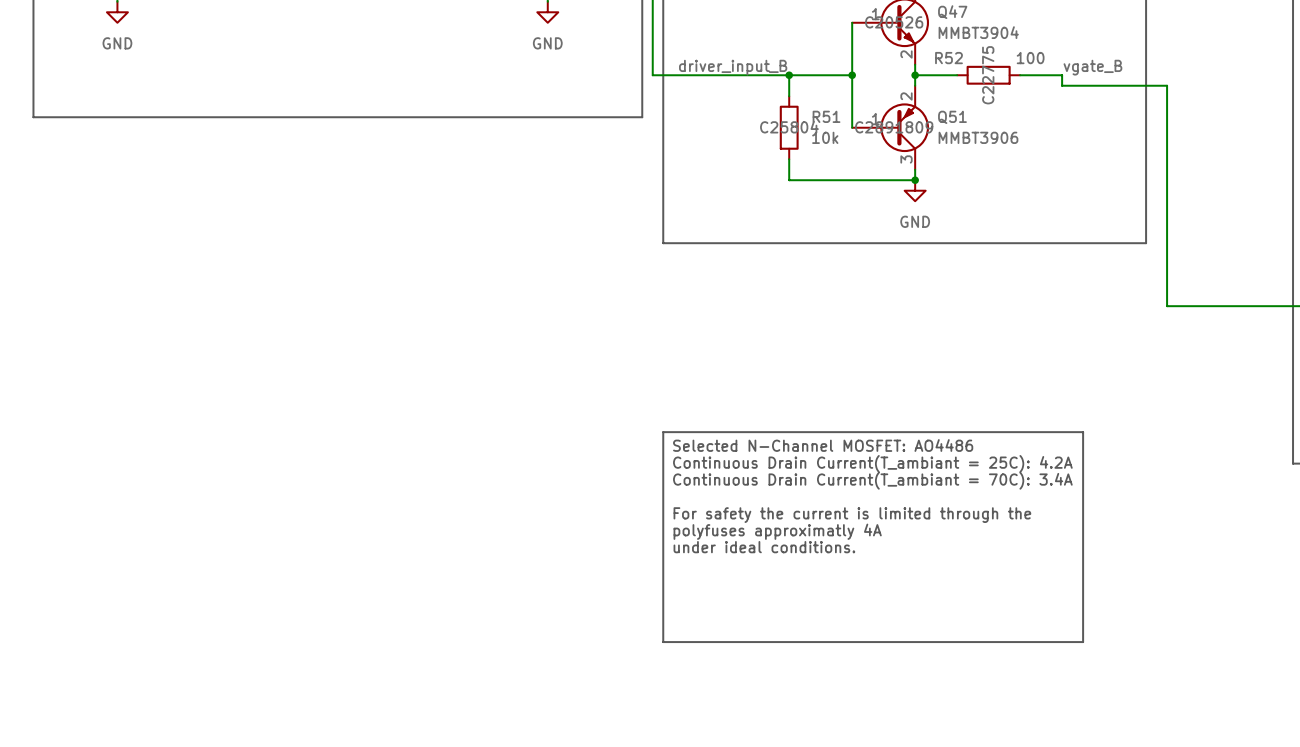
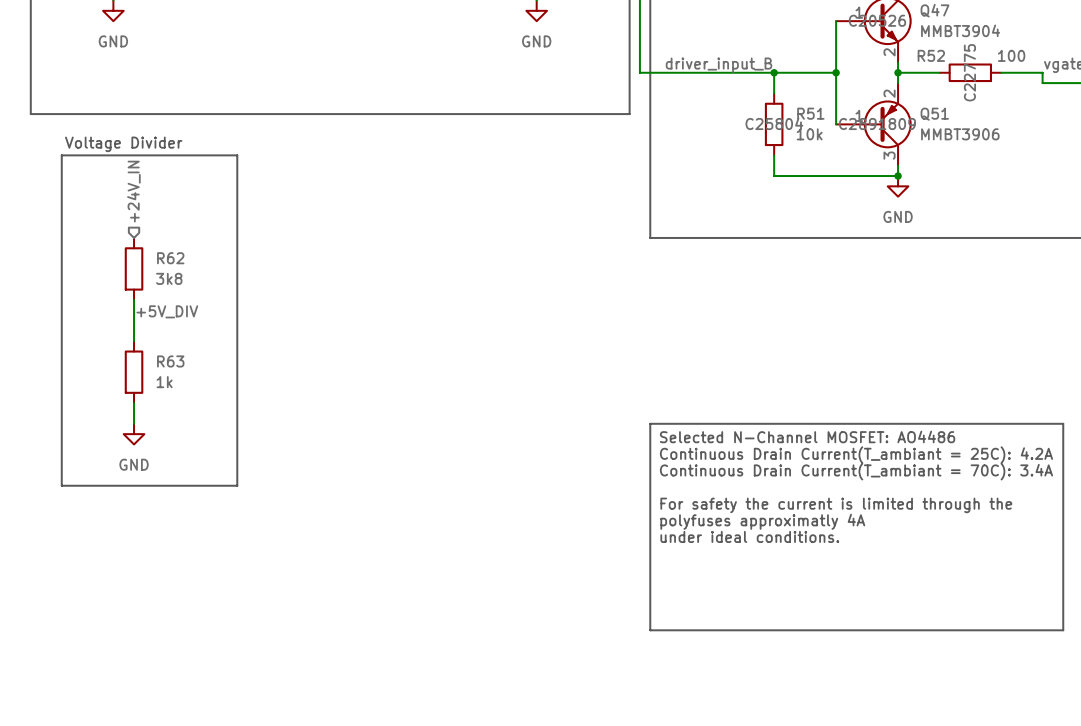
text: none -> Voltage Divider (123, 144)
line: none -> (61, 155) (237, 155) (237, 485) (61, 485) (61, 155)
hierarchical label: none -> +24V_IN (133, 191)
R62: none -> 3k8 (134, 268)
wire: none -> (134, 299) (134, 341)
label: none -> +5V_DIV (167, 311)
R63: none -> 1k (134, 372)
wire: none -> (134, 403) (134, 423)
power symbol: none -> GND (134, 434)

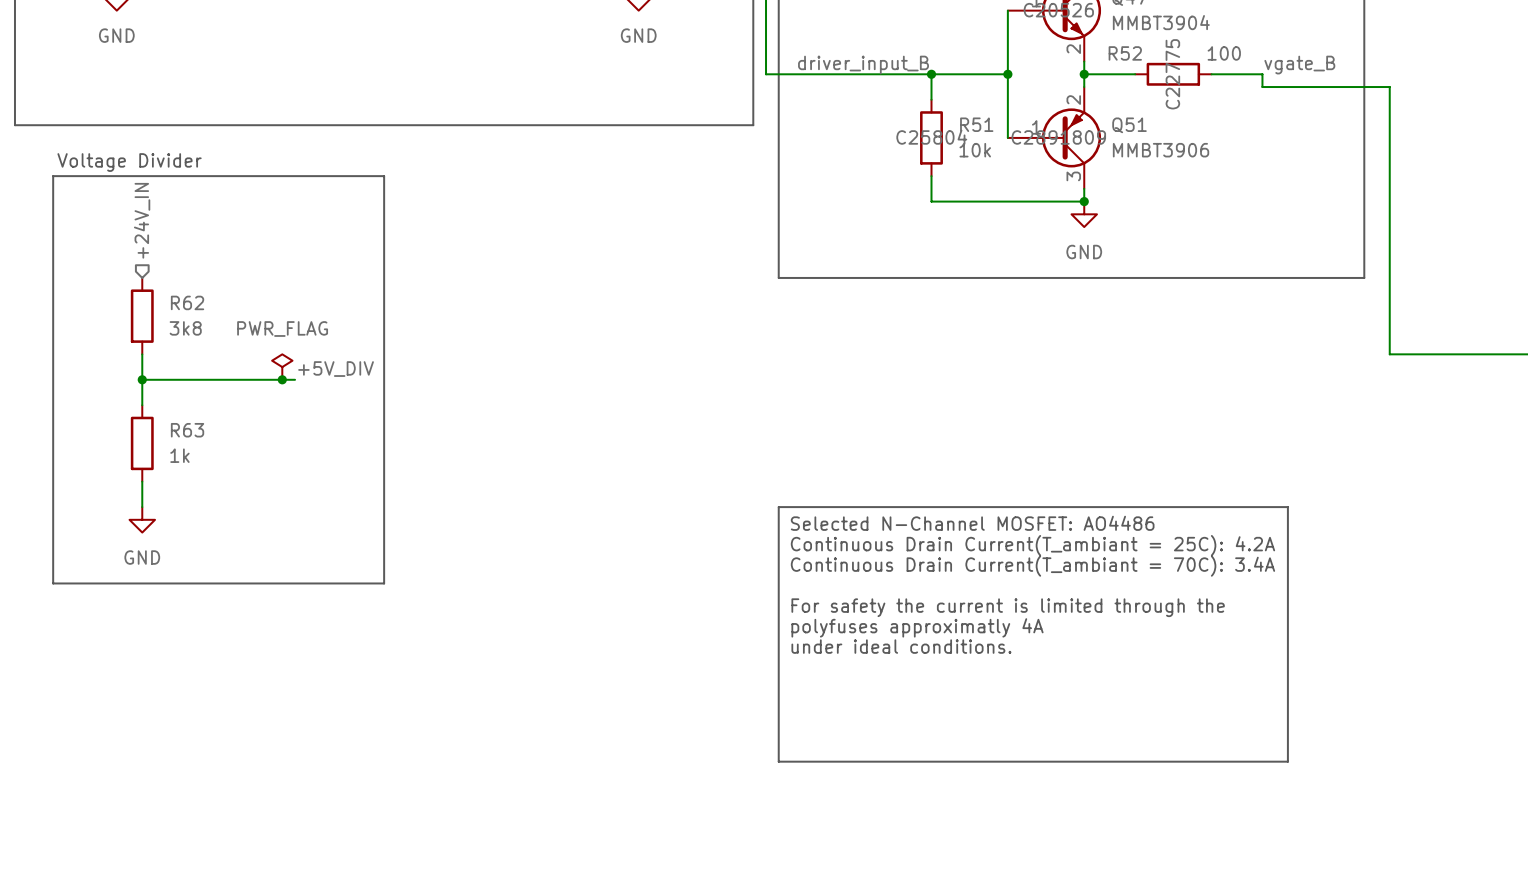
line: (237, 155) (237, 485) -> (269, 176) (384, 176) (384, 583) (269, 583)
power symbol: none -> PWR_FLAG (282, 367)
label position: +5V_DIV (167, 311) -> +5V_DIV (336, 369)
wire: none -> (142, 379) (295, 379)
junction: none -> (142, 379)
junction: none -> (282, 379)

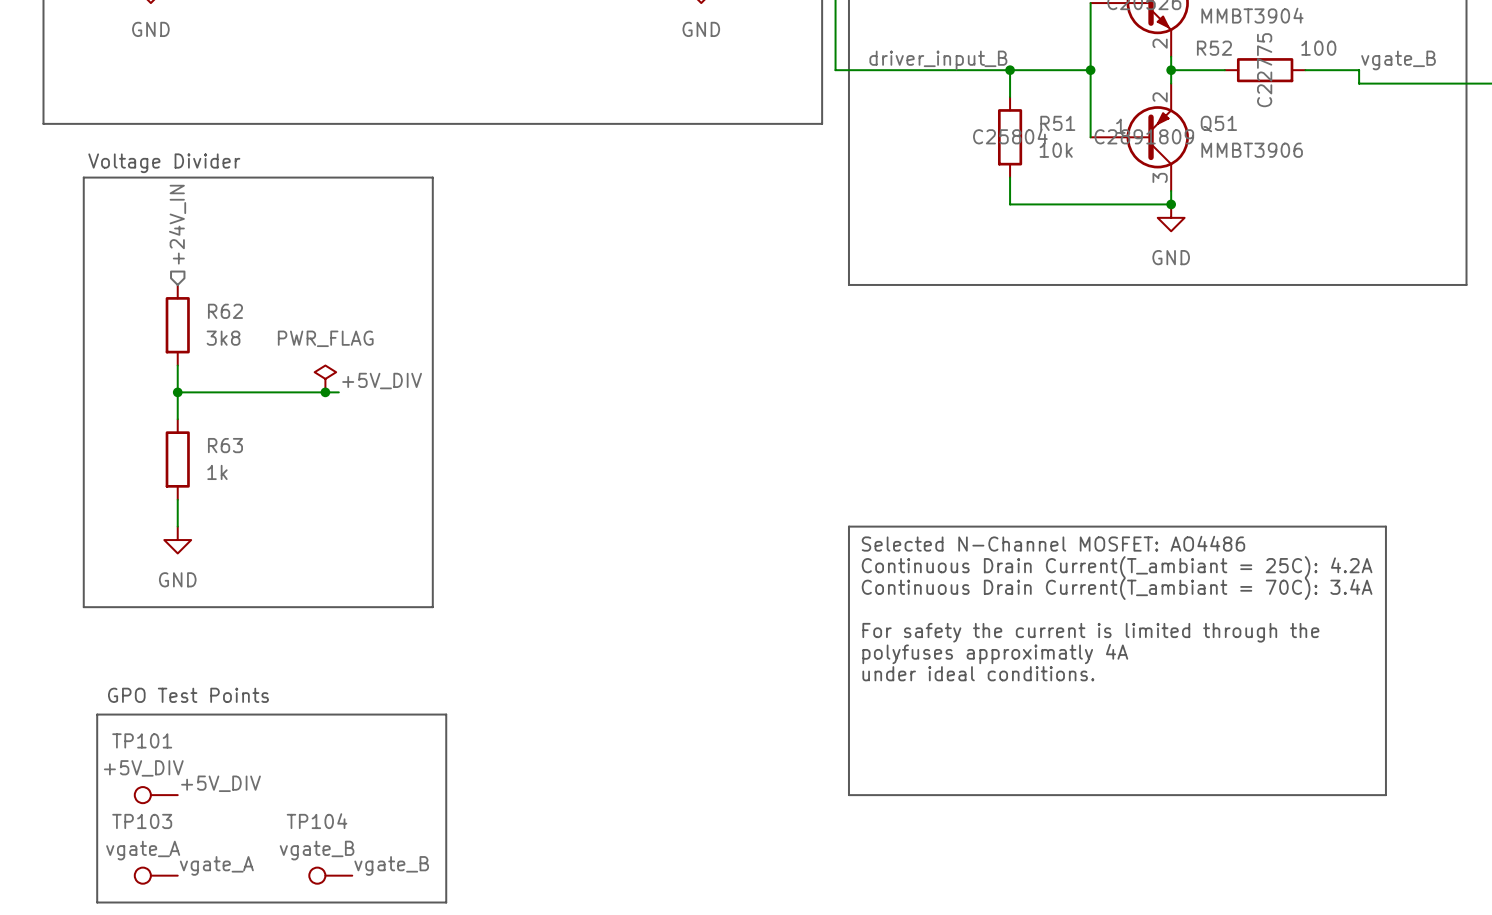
text: none -> GPO Test Points (188, 695)
line: none -> (97, 714) (446, 714) (446, 902) (97, 902) (97, 714)
label: none -> +5V_DIV (220, 783)
TP101: none -> +5V_DIV (156, 795)
label: none -> vgate_A (216, 865)
label: none -> vgate_B (391, 865)
TP103: none -> vgate_A (156, 875)
TP104: none -> vgate_B (330, 875)

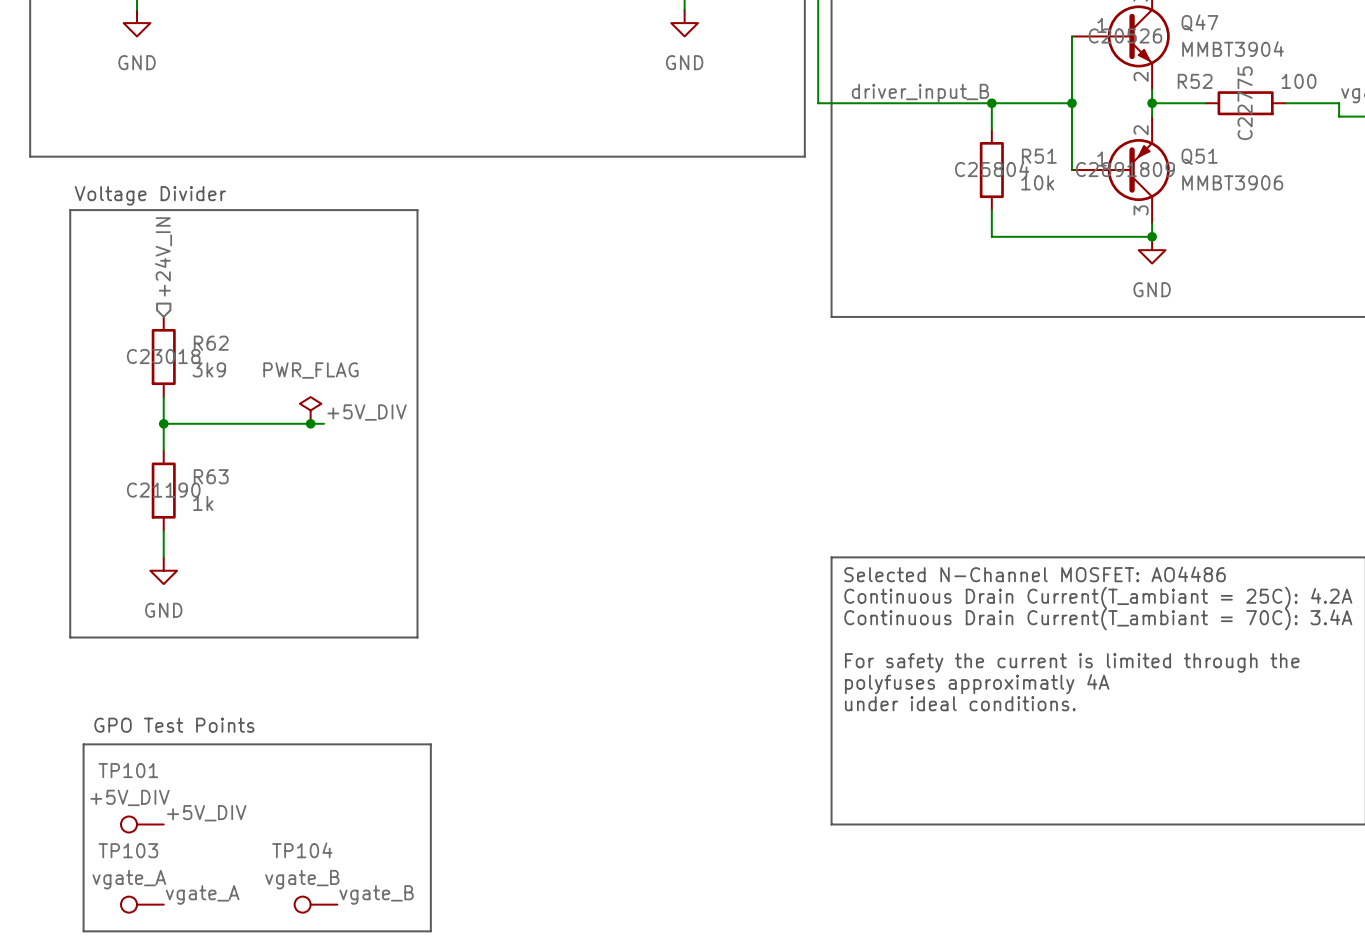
R62 text: none -> C23018 (163, 356)
R62 value: 3k8 (223, 338) -> 3k9 (209, 369)
R63 text: none -> C21190 (163, 490)

